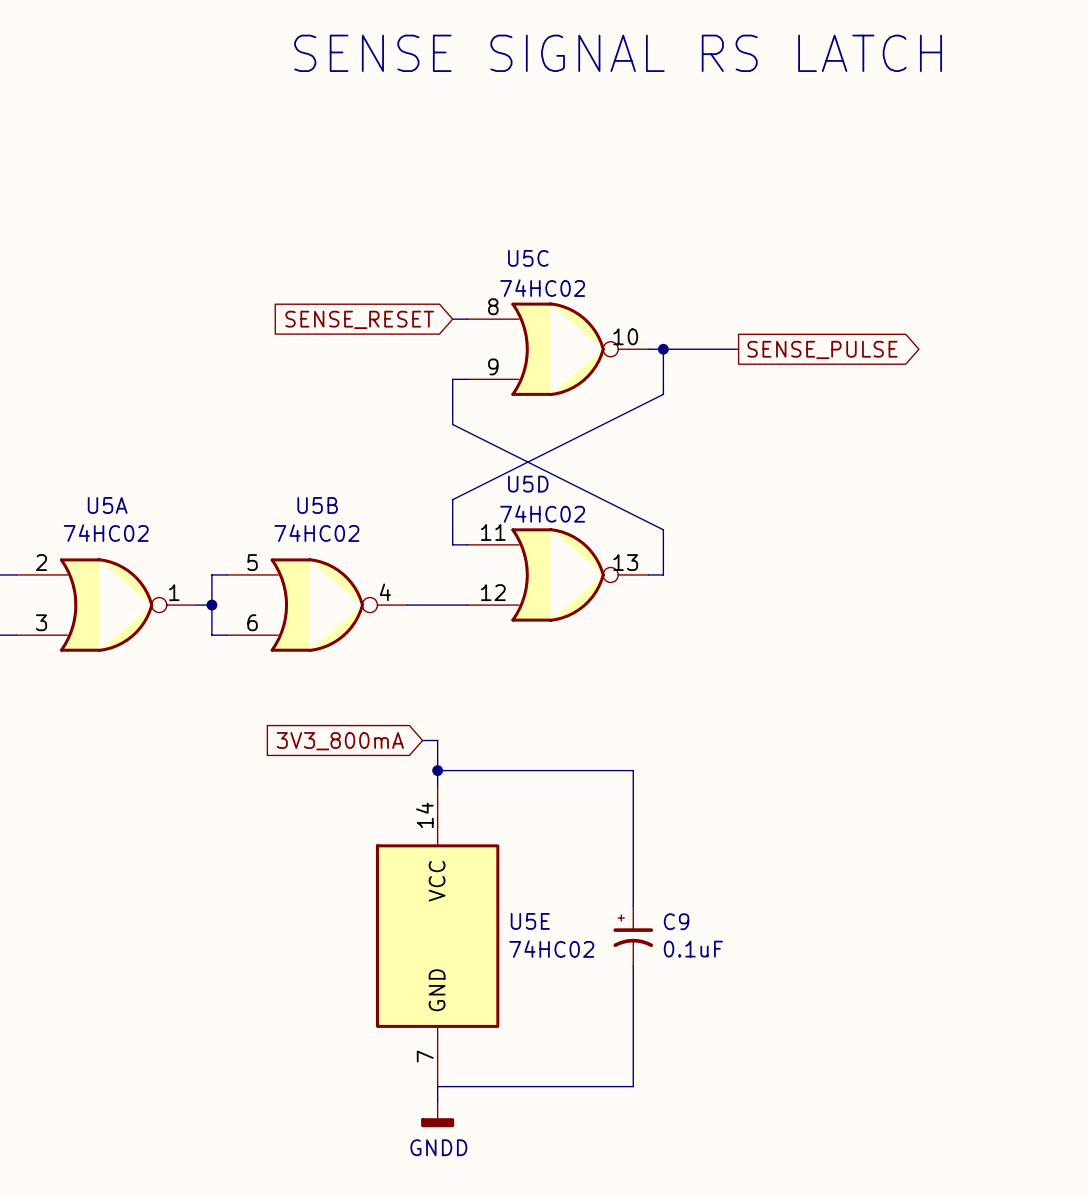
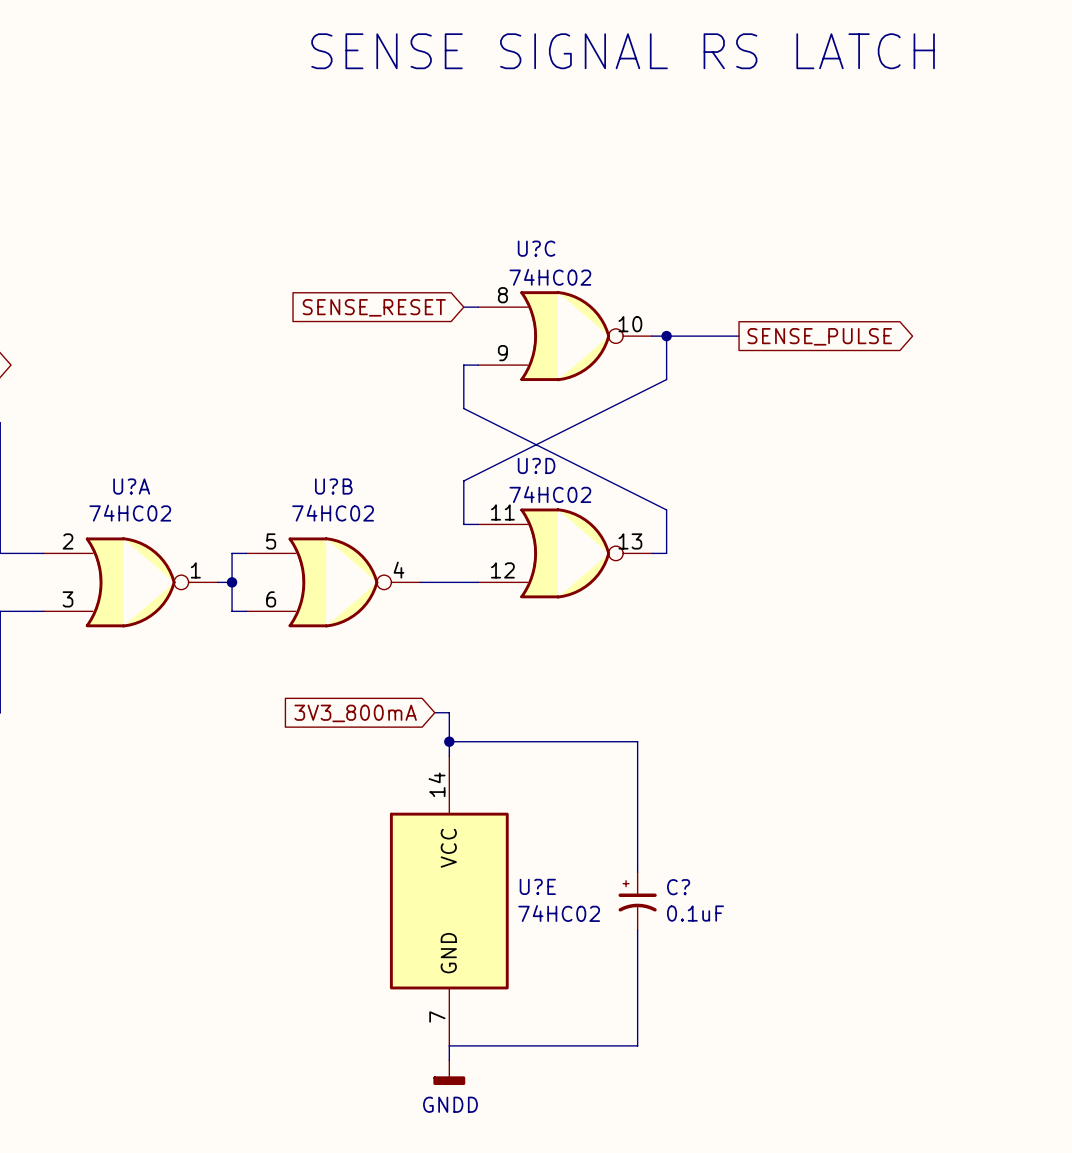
U5C name: U5C (528, 258) -> U?C (536, 248)
U5D name: U5D (528, 484) -> U?D (536, 465)
U5A name: U5A (107, 505) -> U?A (131, 486)
U5B name: U5B (317, 505) -> U?B (333, 486)
U5E name: U5E (530, 921) -> U?E (537, 886)
C9 name: C9 (676, 921) -> C? (678, 887)

